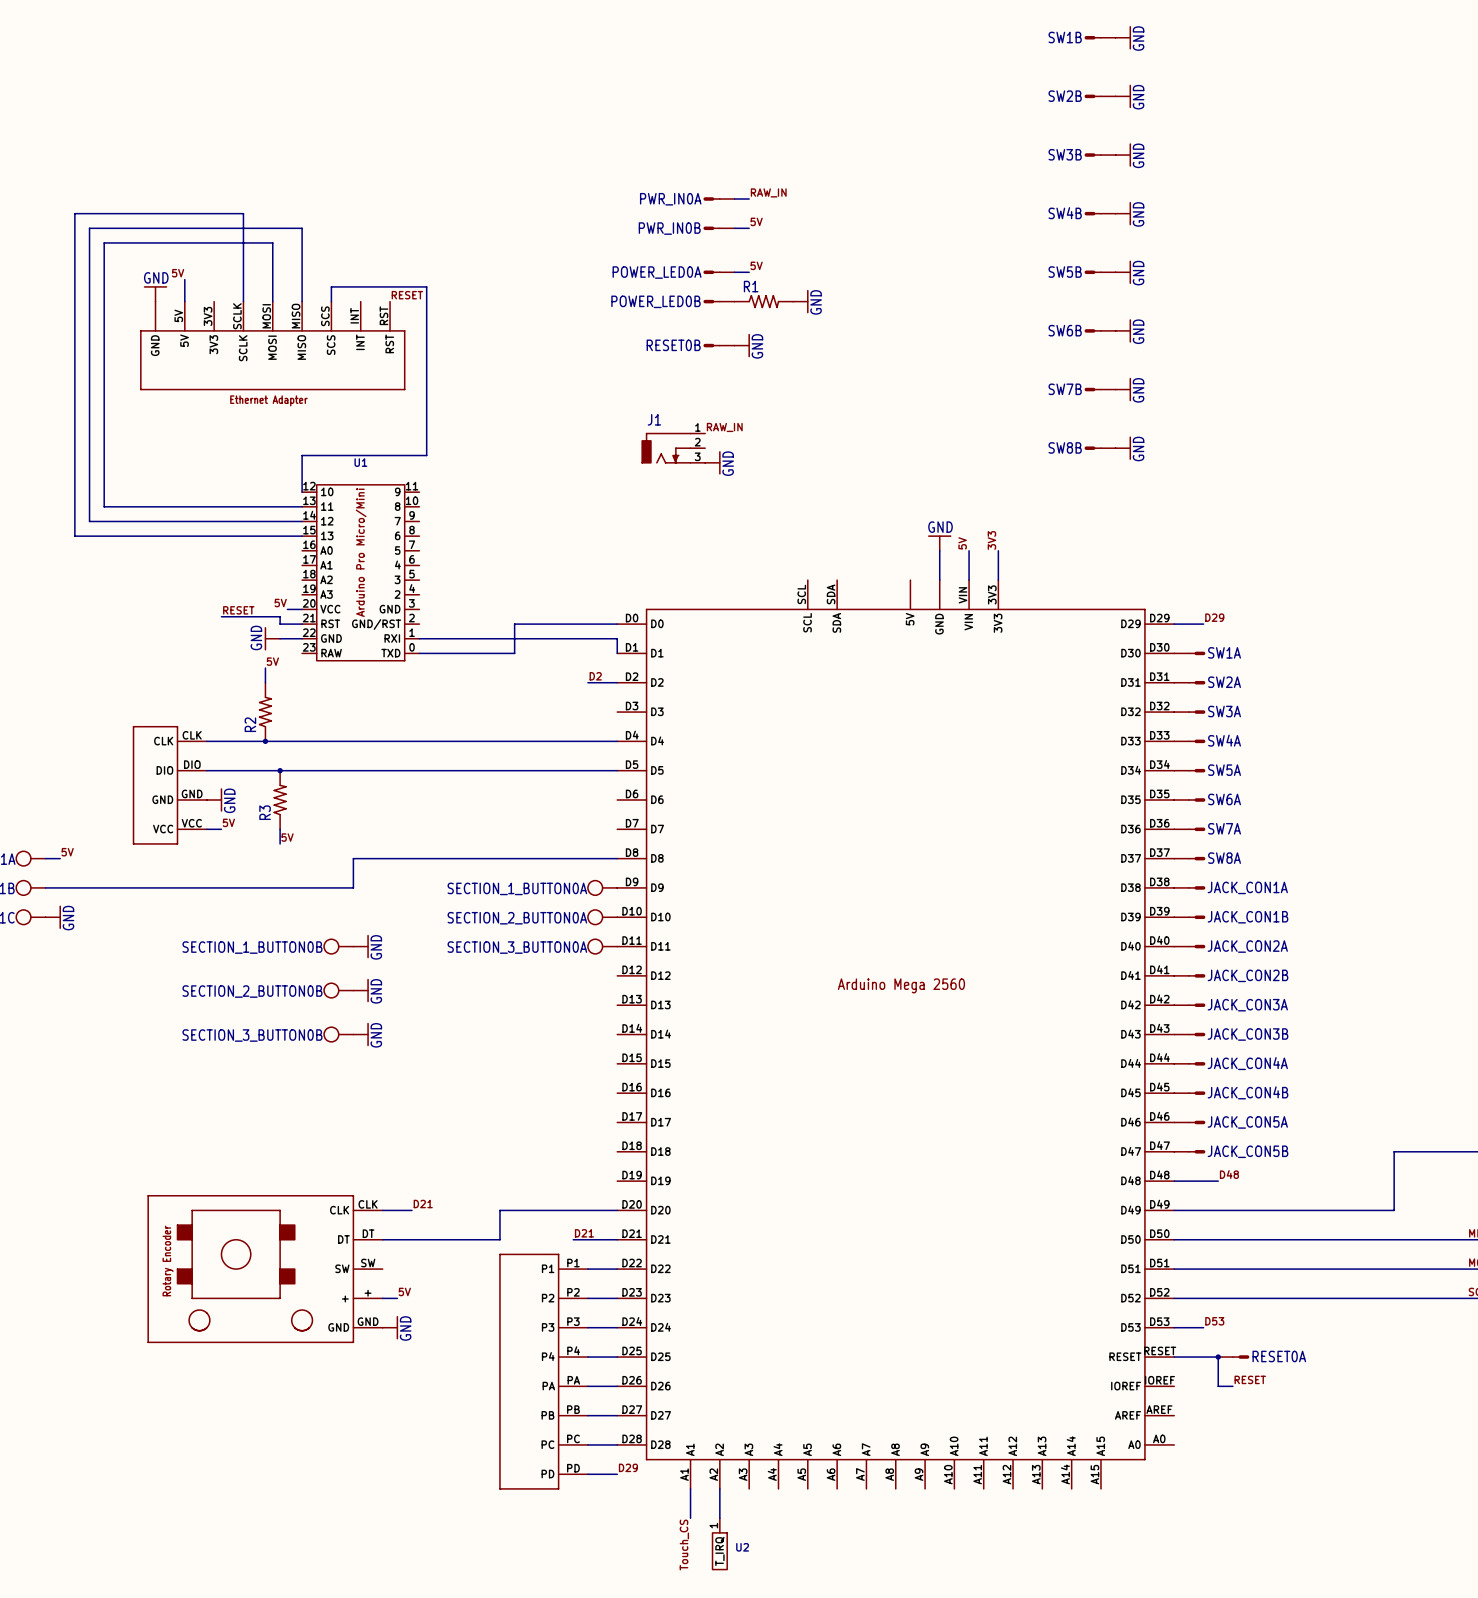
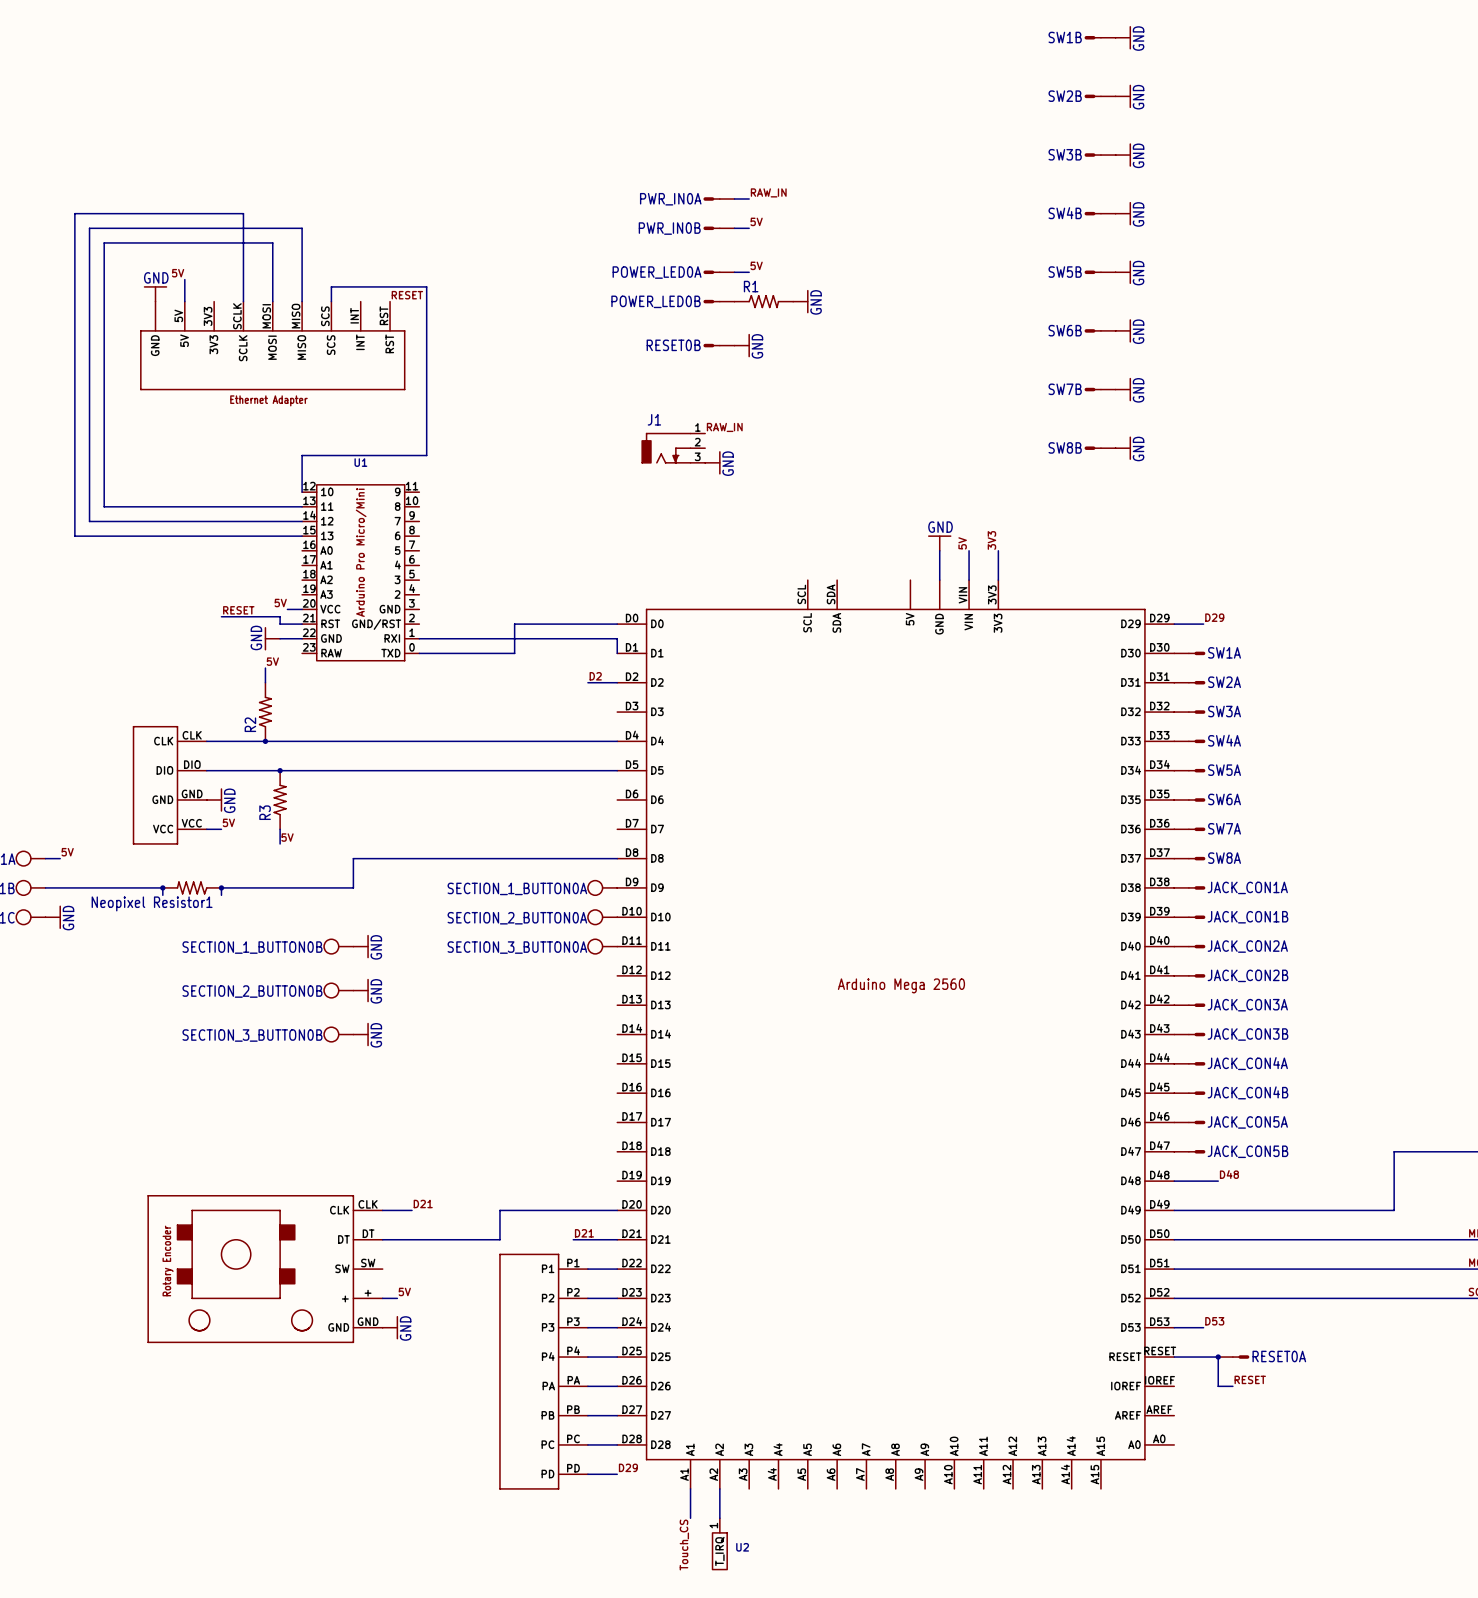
junction: none -> (162, 887)
Neopixel Resistor1: none -> (192, 887)
wire: none -> (221, 887) (221, 895)
junction: none -> (221, 887)

